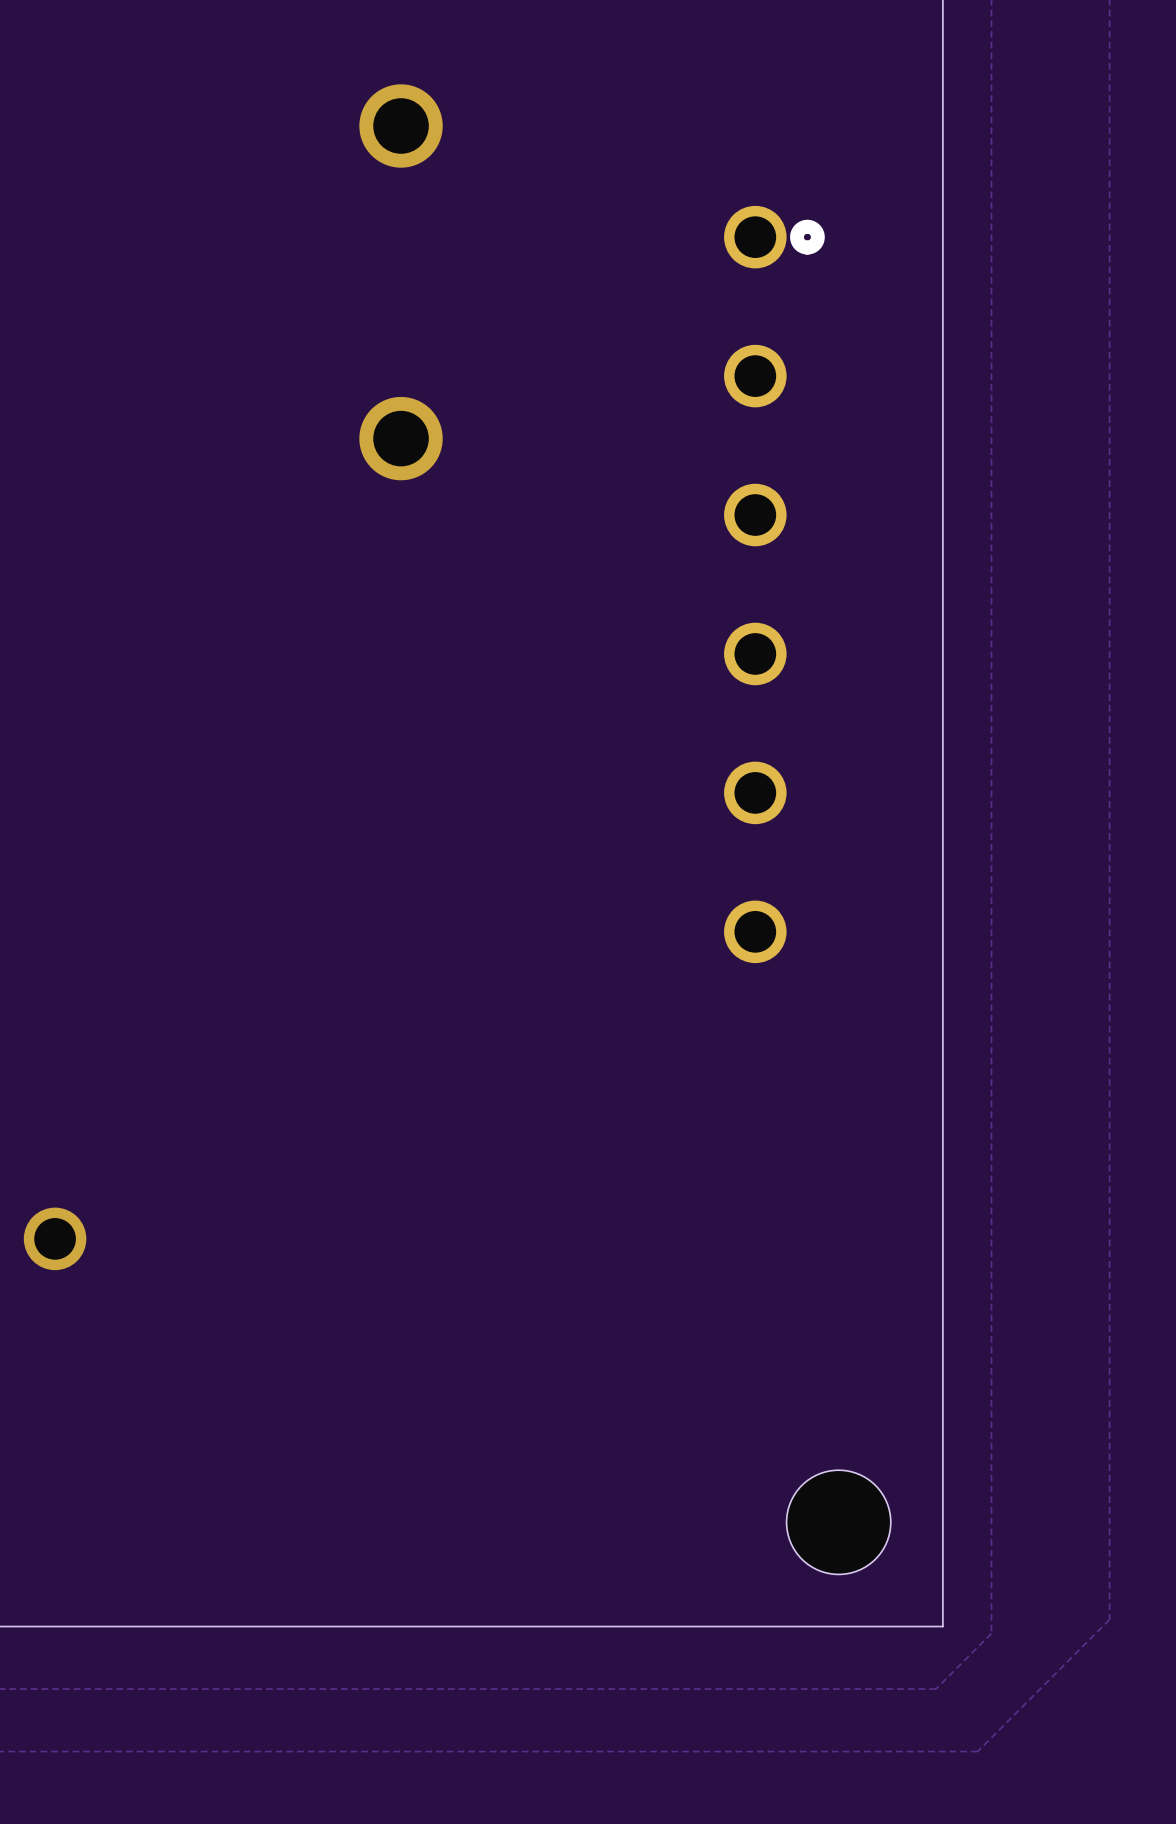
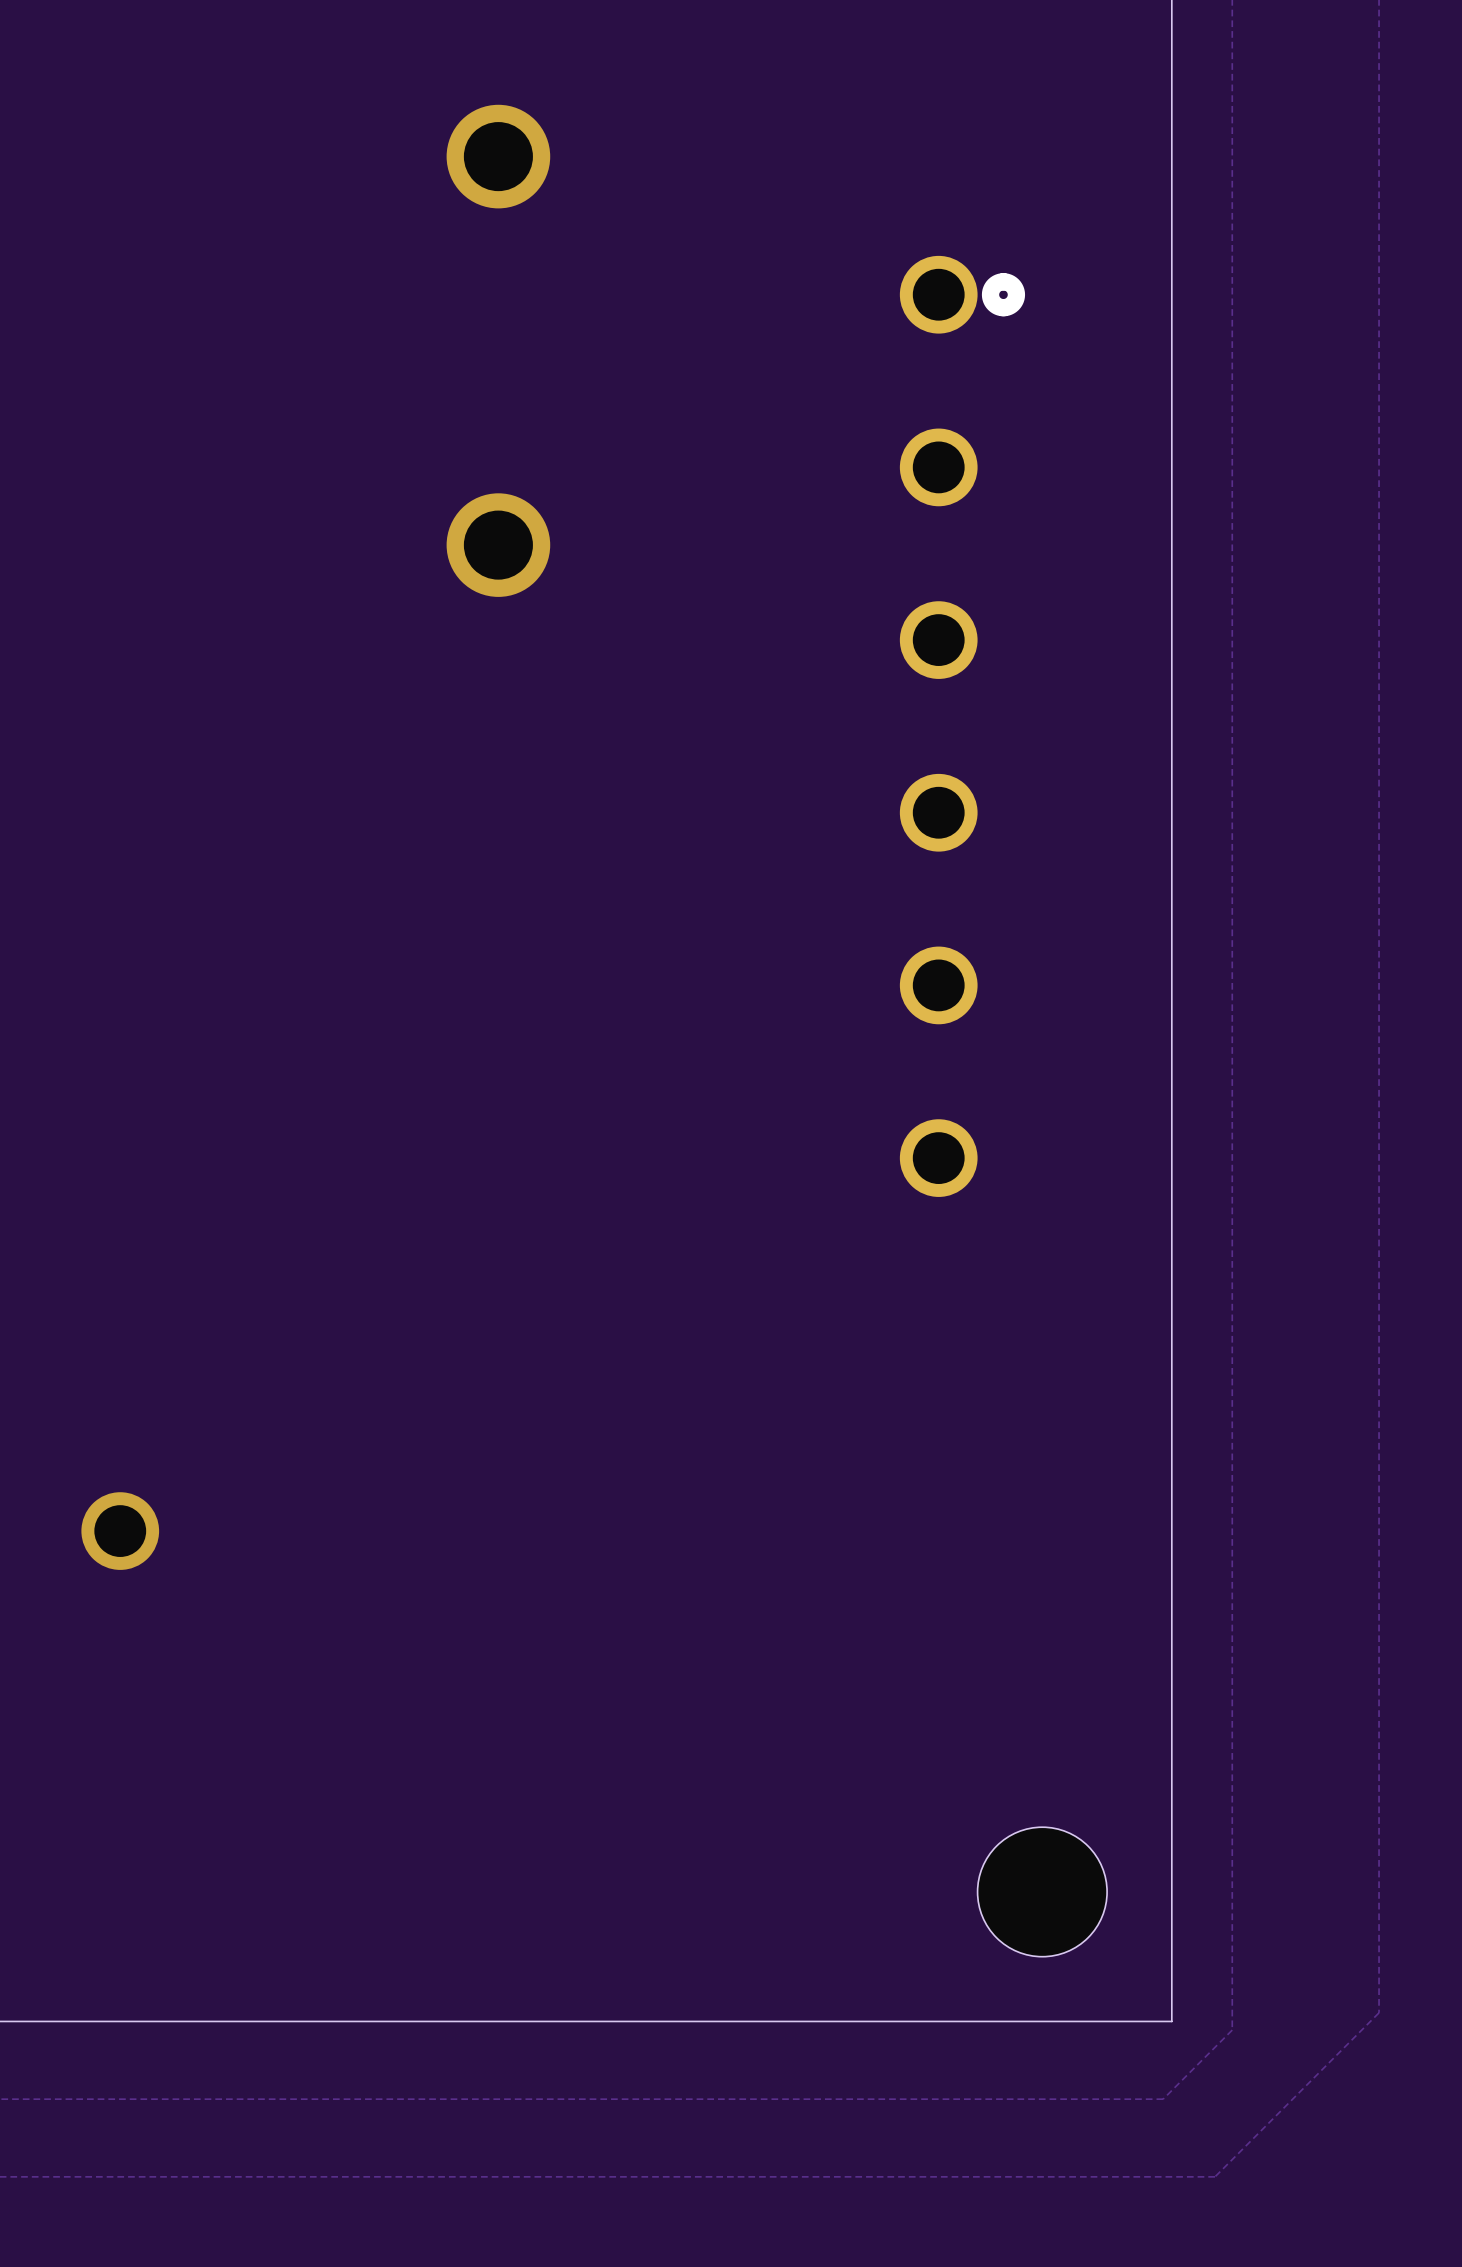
via position: (55, 1238) -> (120, 1531)

